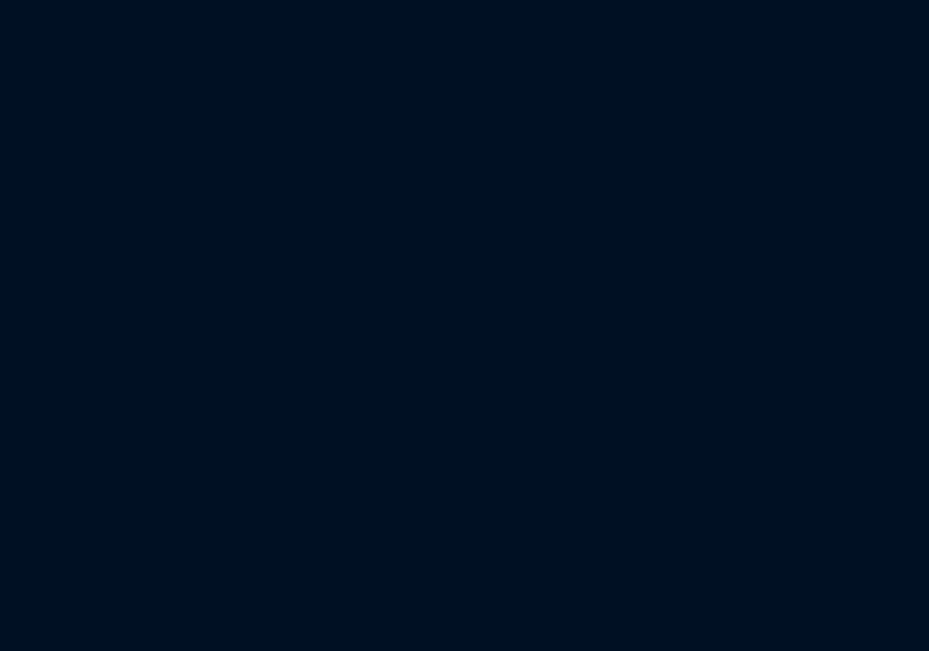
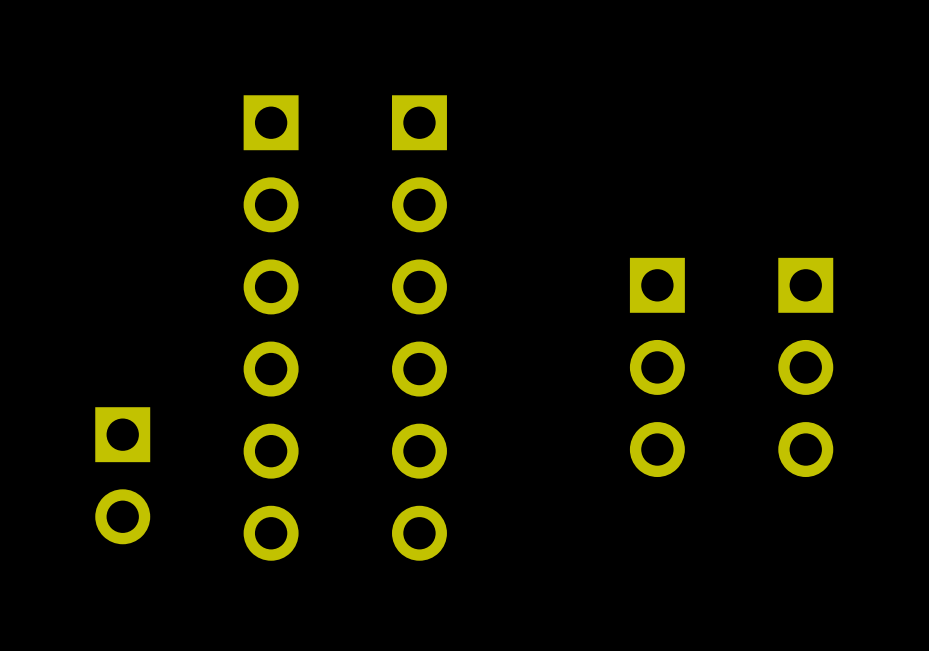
part: none -> (271, 328)
part: none -> (419, 328)
part: none -> (657, 367)
part: none -> (805, 367)
part: none -> (122, 475)

